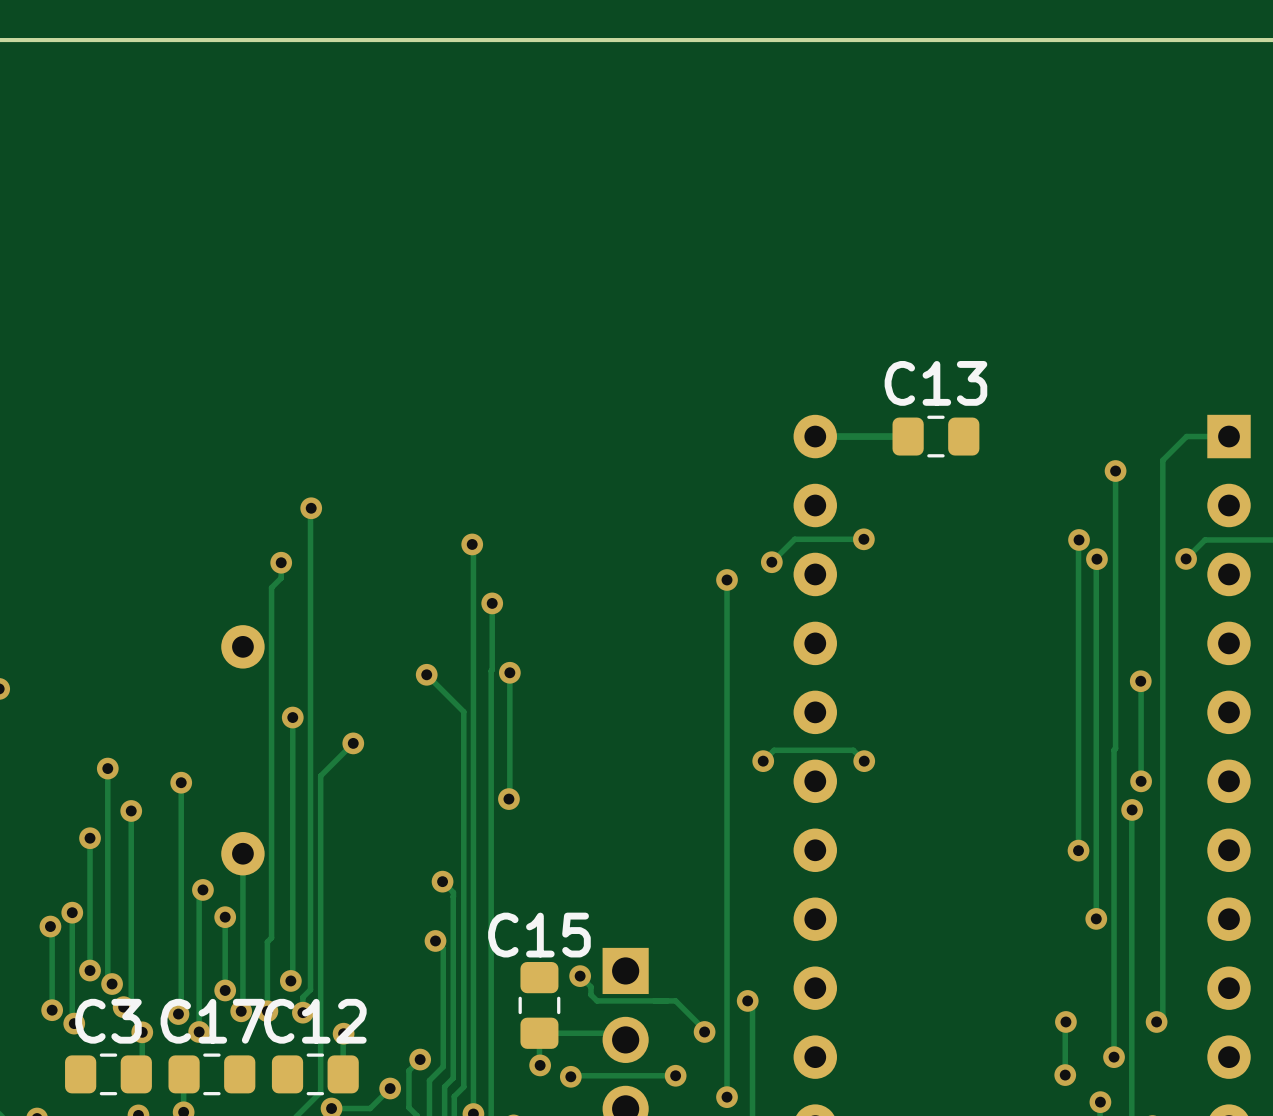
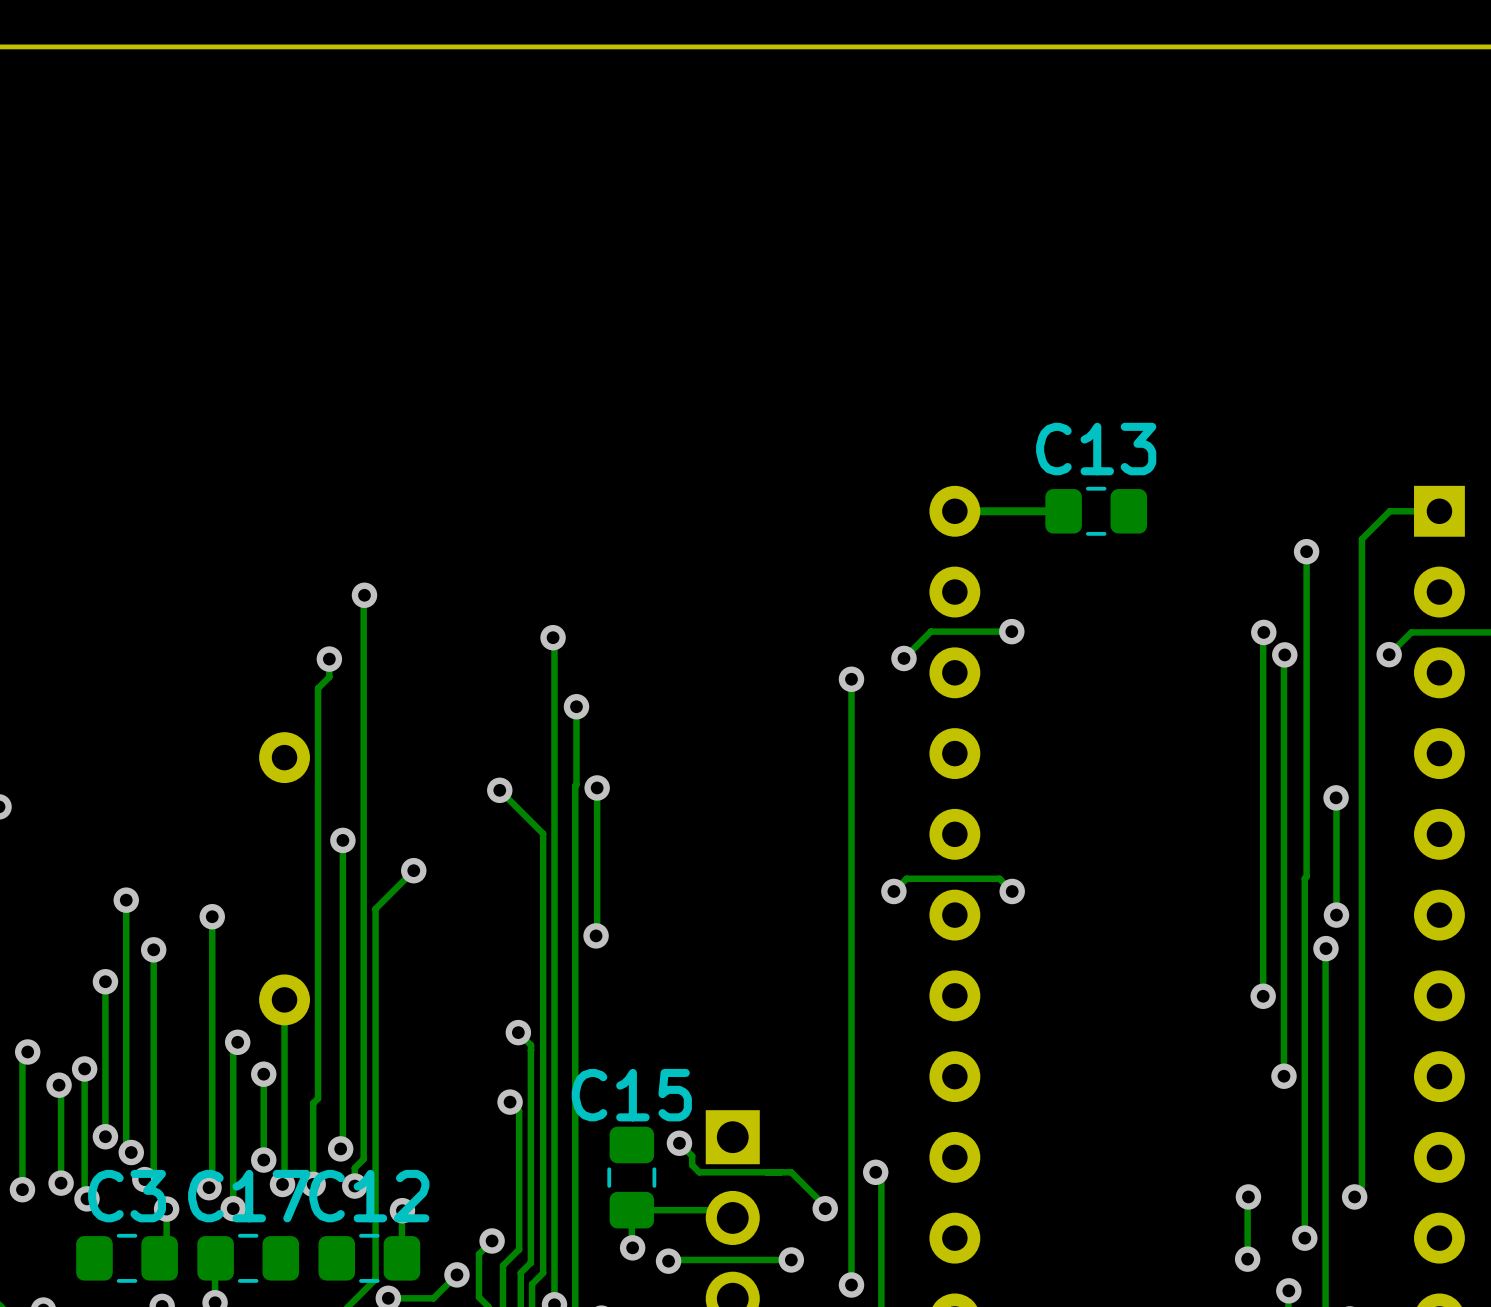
track: none -> (27, 1051) (22, 1057) (22, 1189)
via: none -> (27, 1051)
via: none -> (22, 1189)

